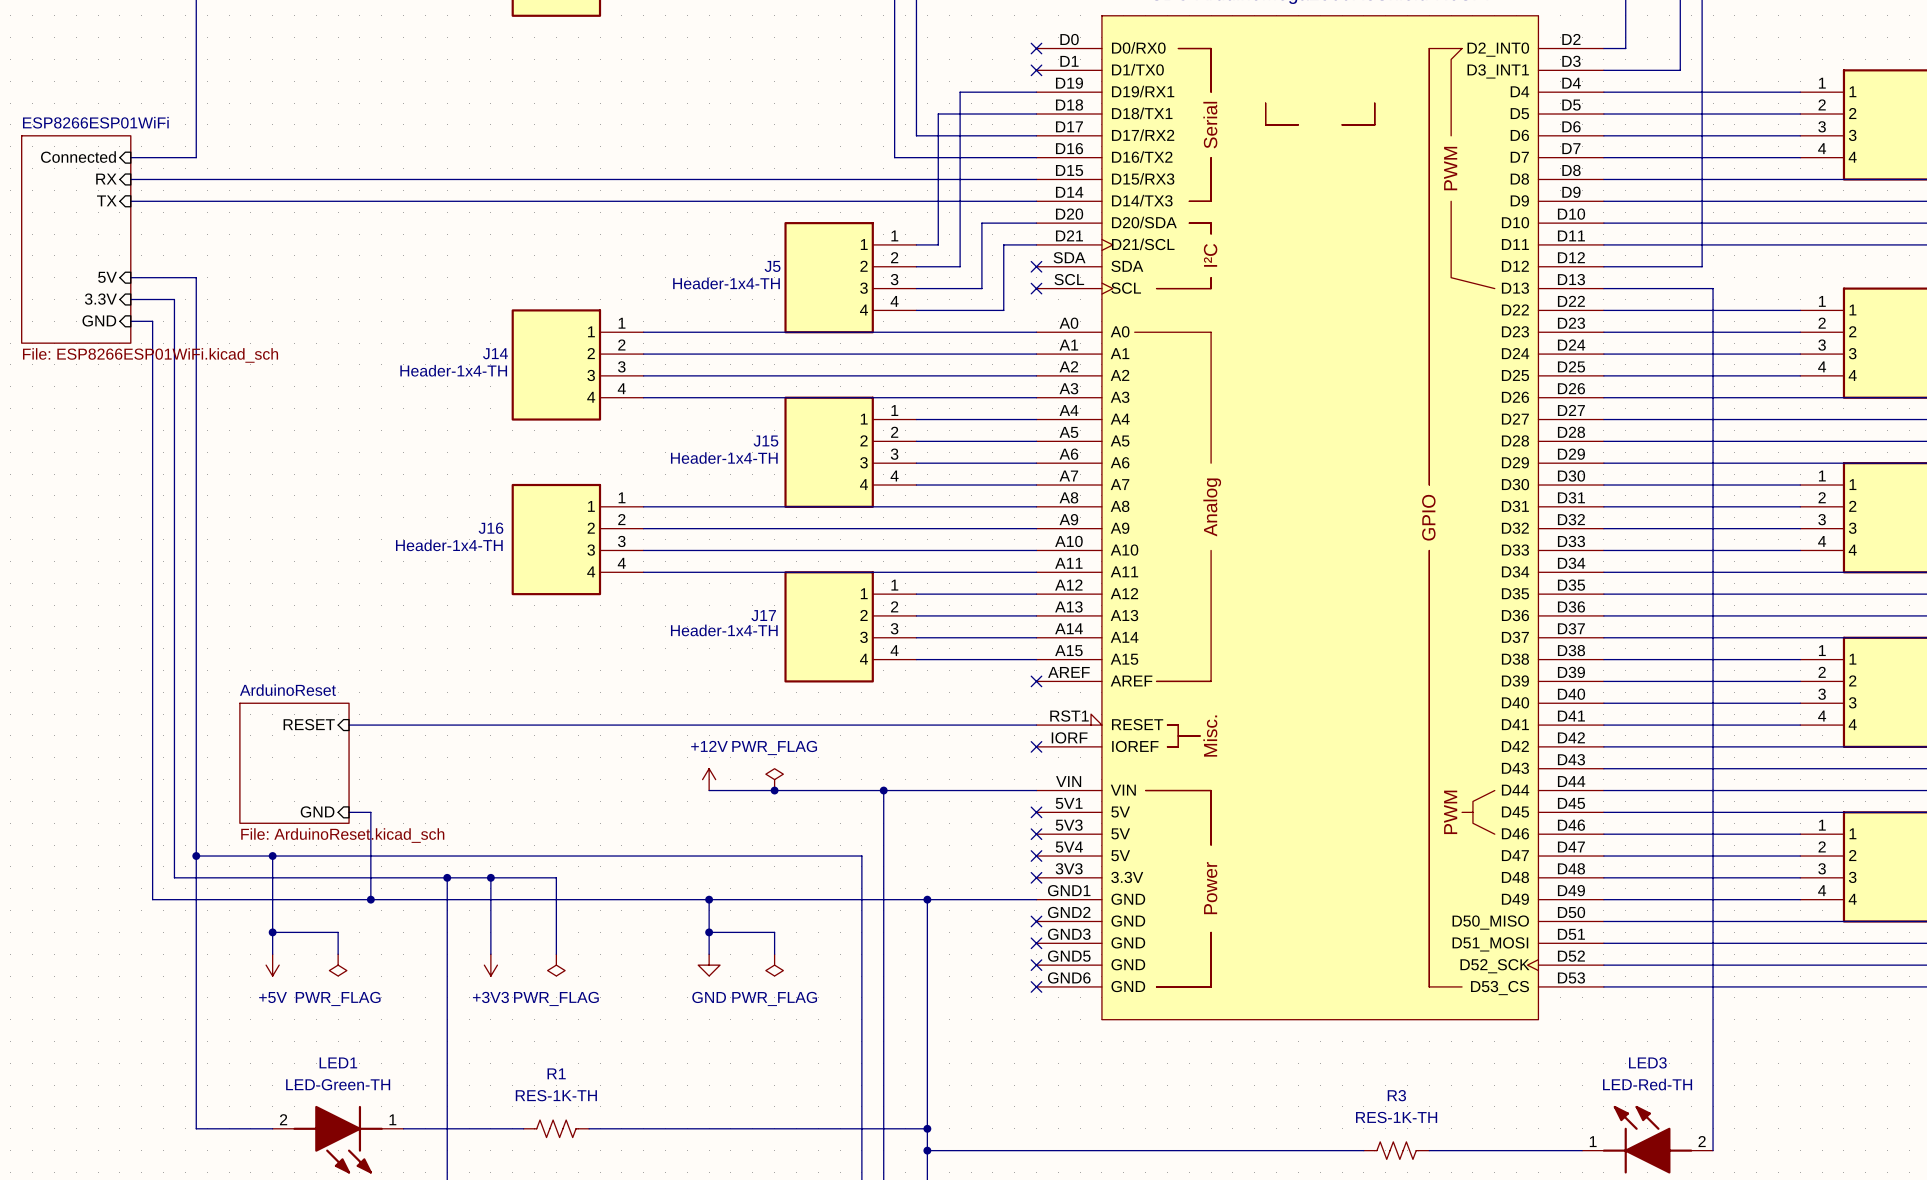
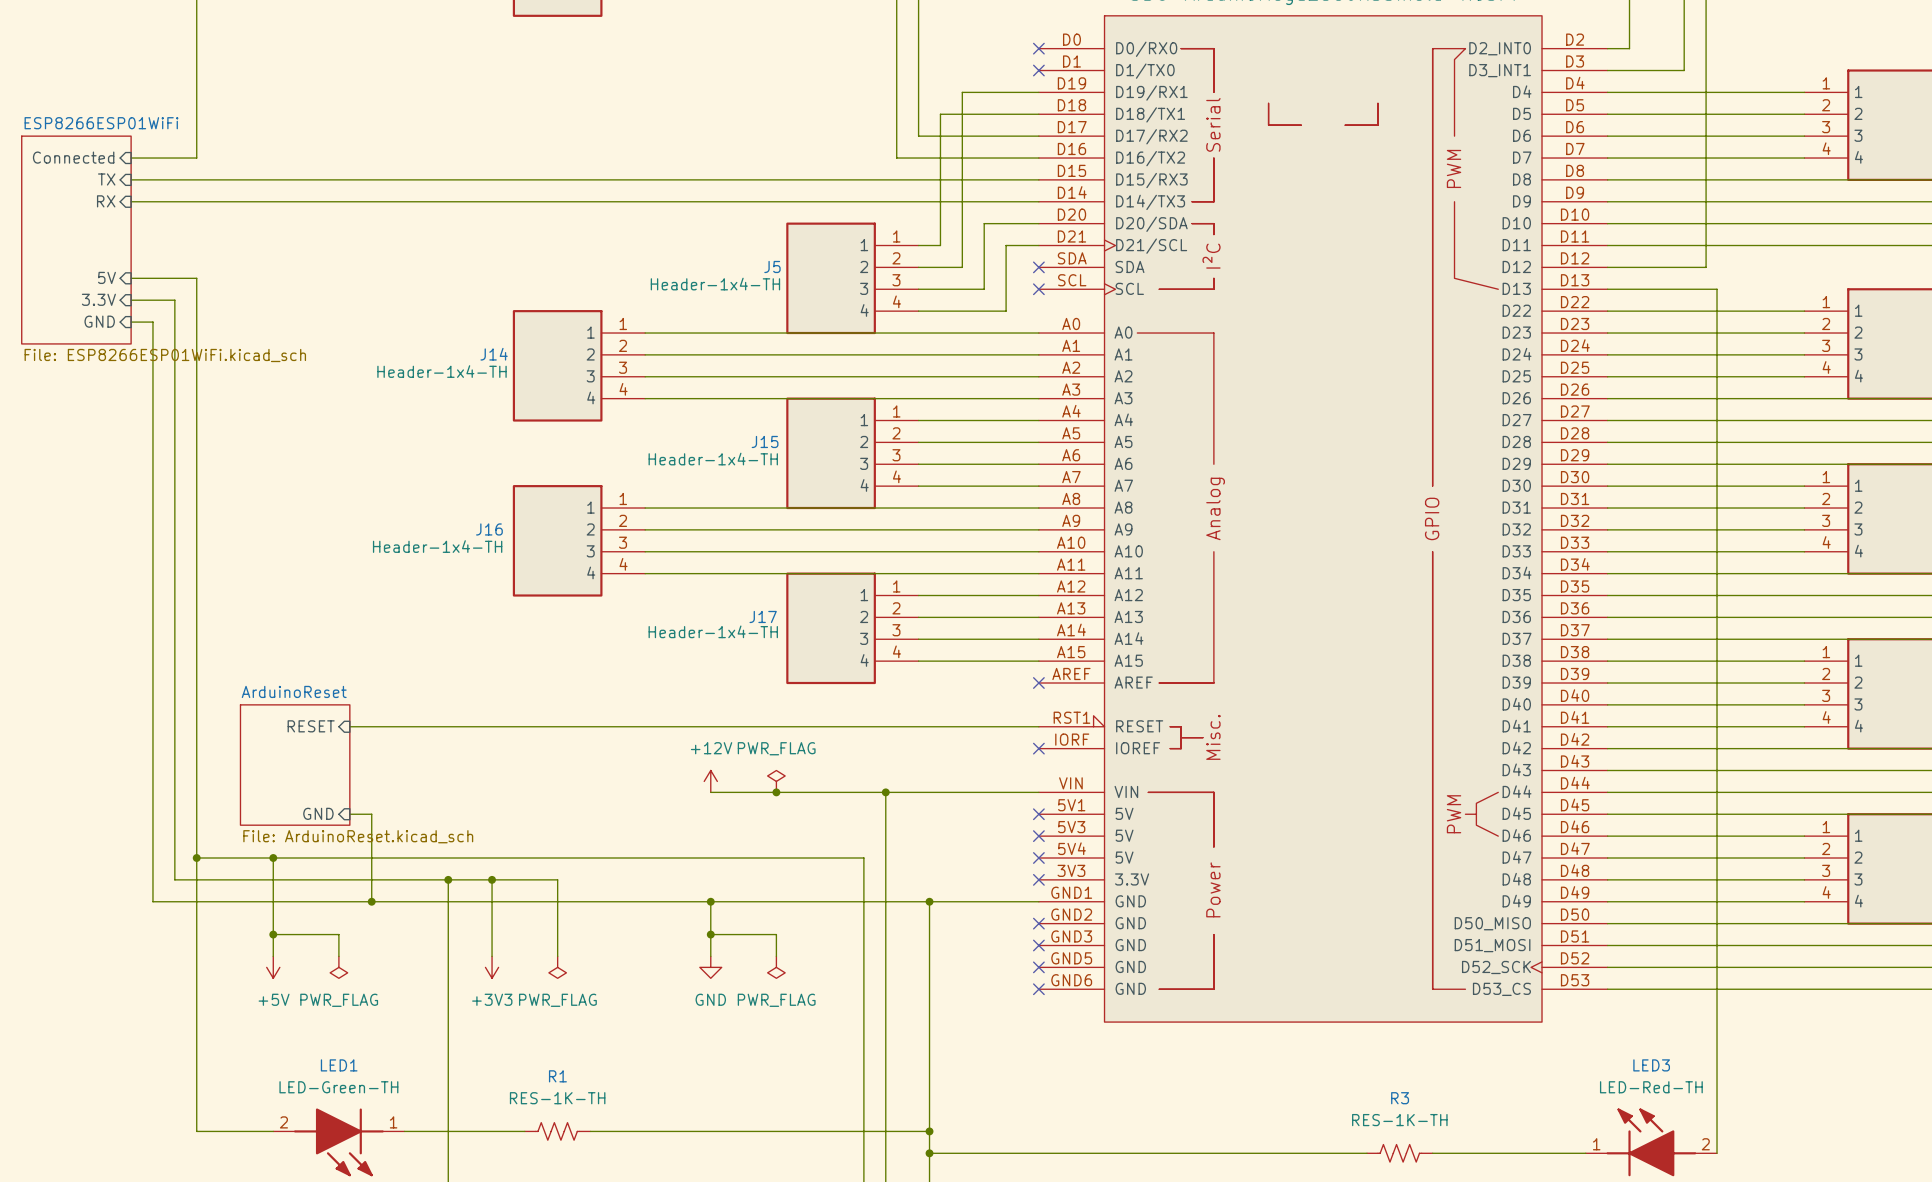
sheet pin: RX (106, 179) -> TX (106, 179)
sheet pin: TX (106, 200) -> RX (106, 201)

